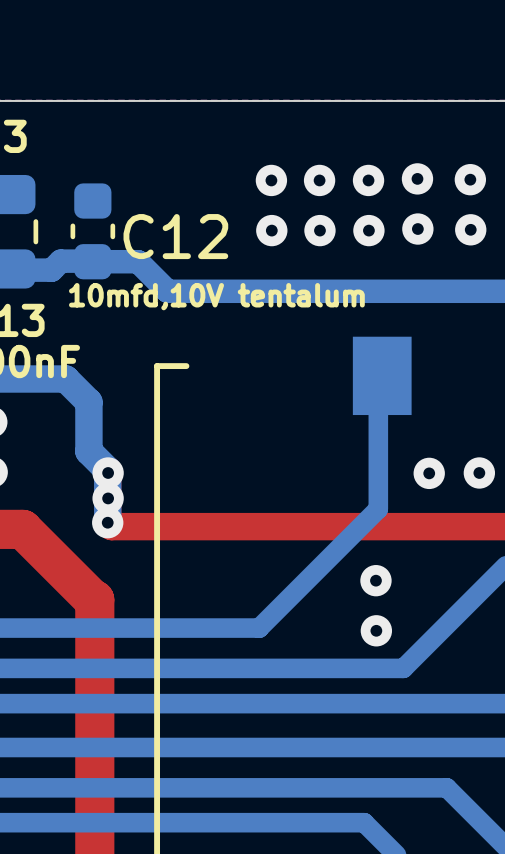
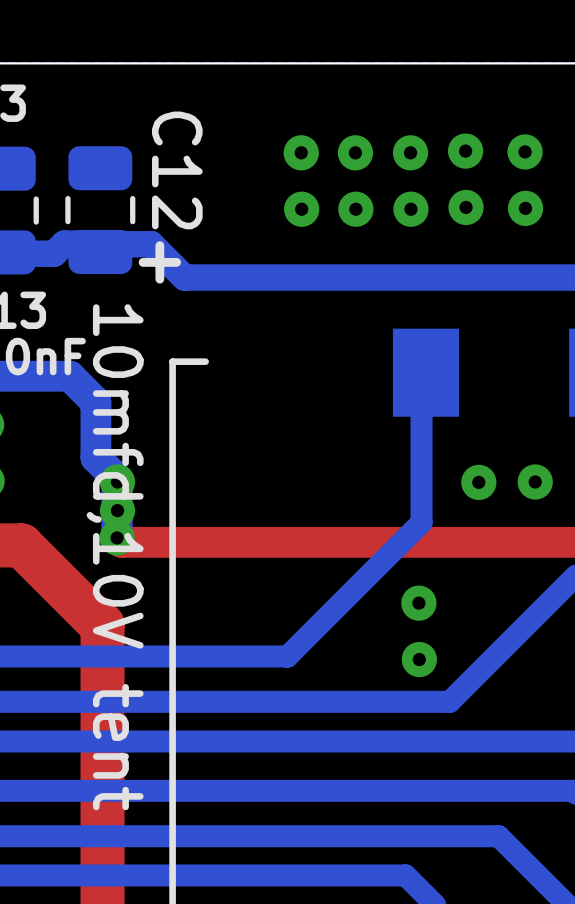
C12 footprint: [70, 183, 116, 280] -> [65, 146, 136, 275]
C12 name rotation: 0° (175, 236) -> 90° clockwise (177, 170)
text: none -> + (159, 262)
C12 value: 10mfd,10V tentalum (216, 296) -> 10mfd,10V tent (115, 557)

